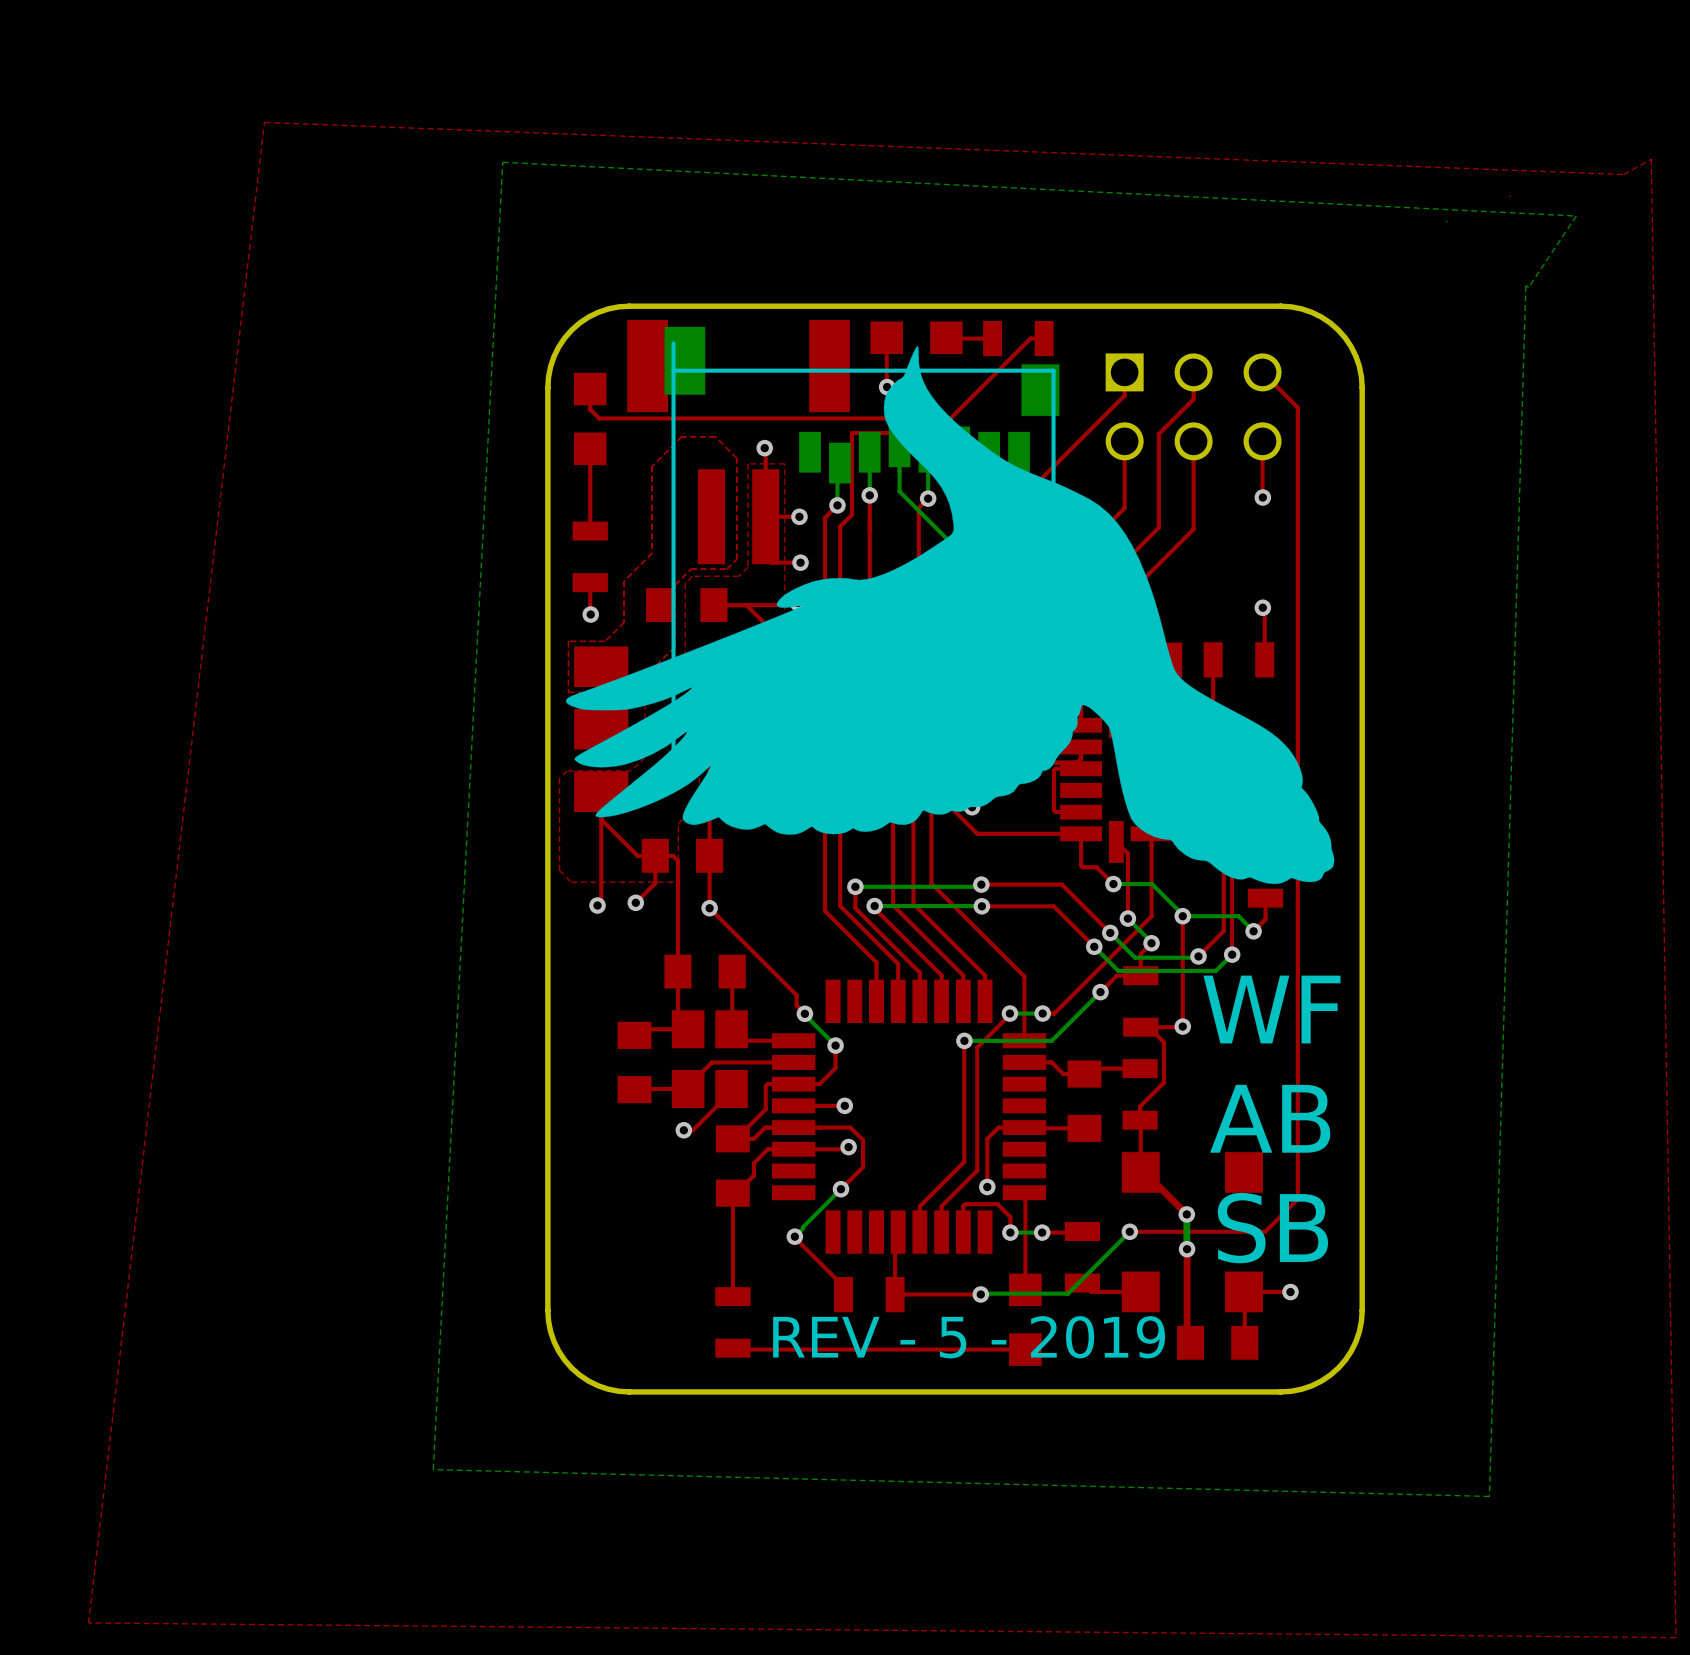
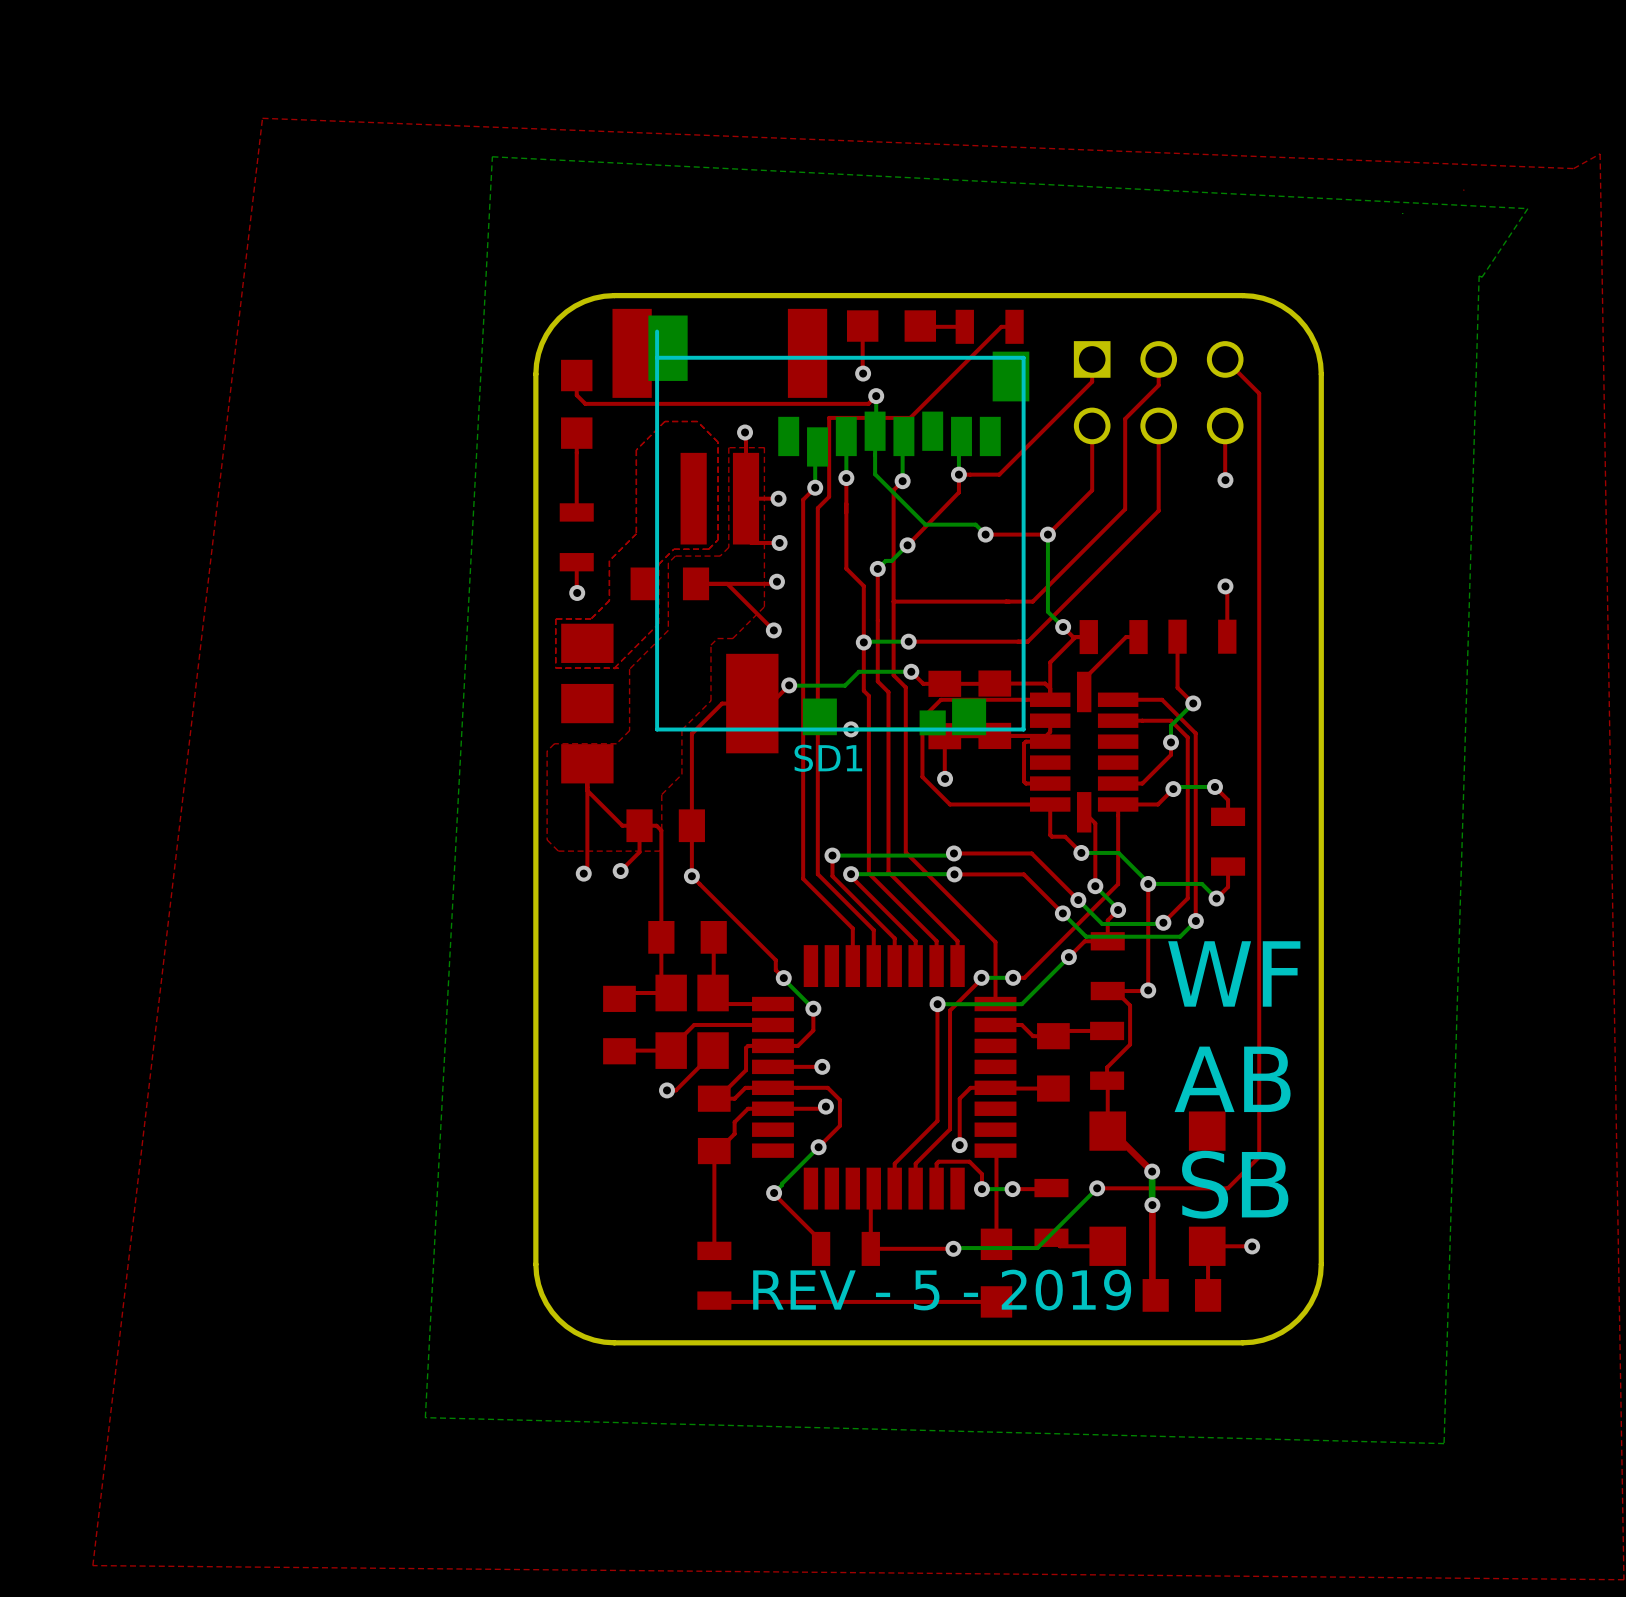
drawing: [565, 346, 1335, 885] -> none

